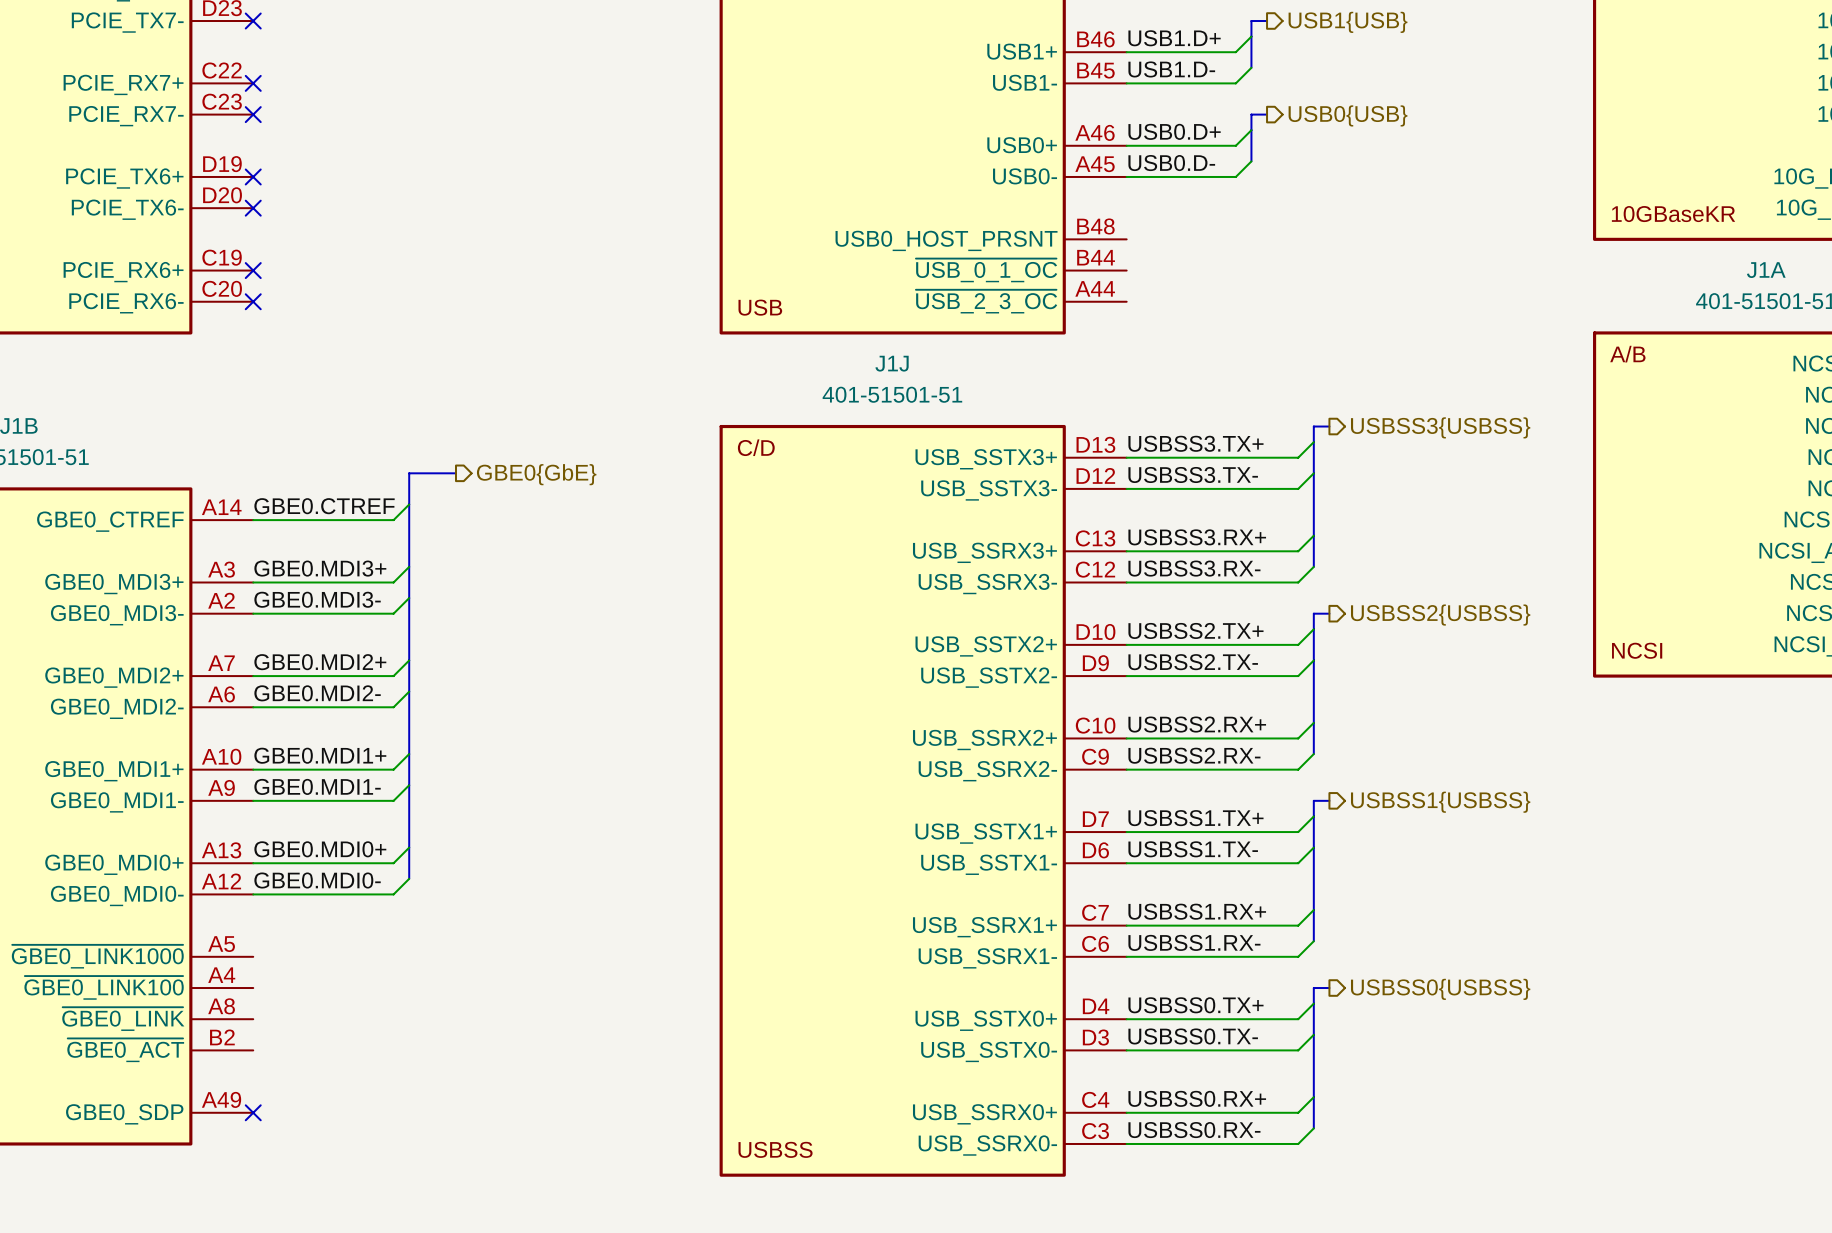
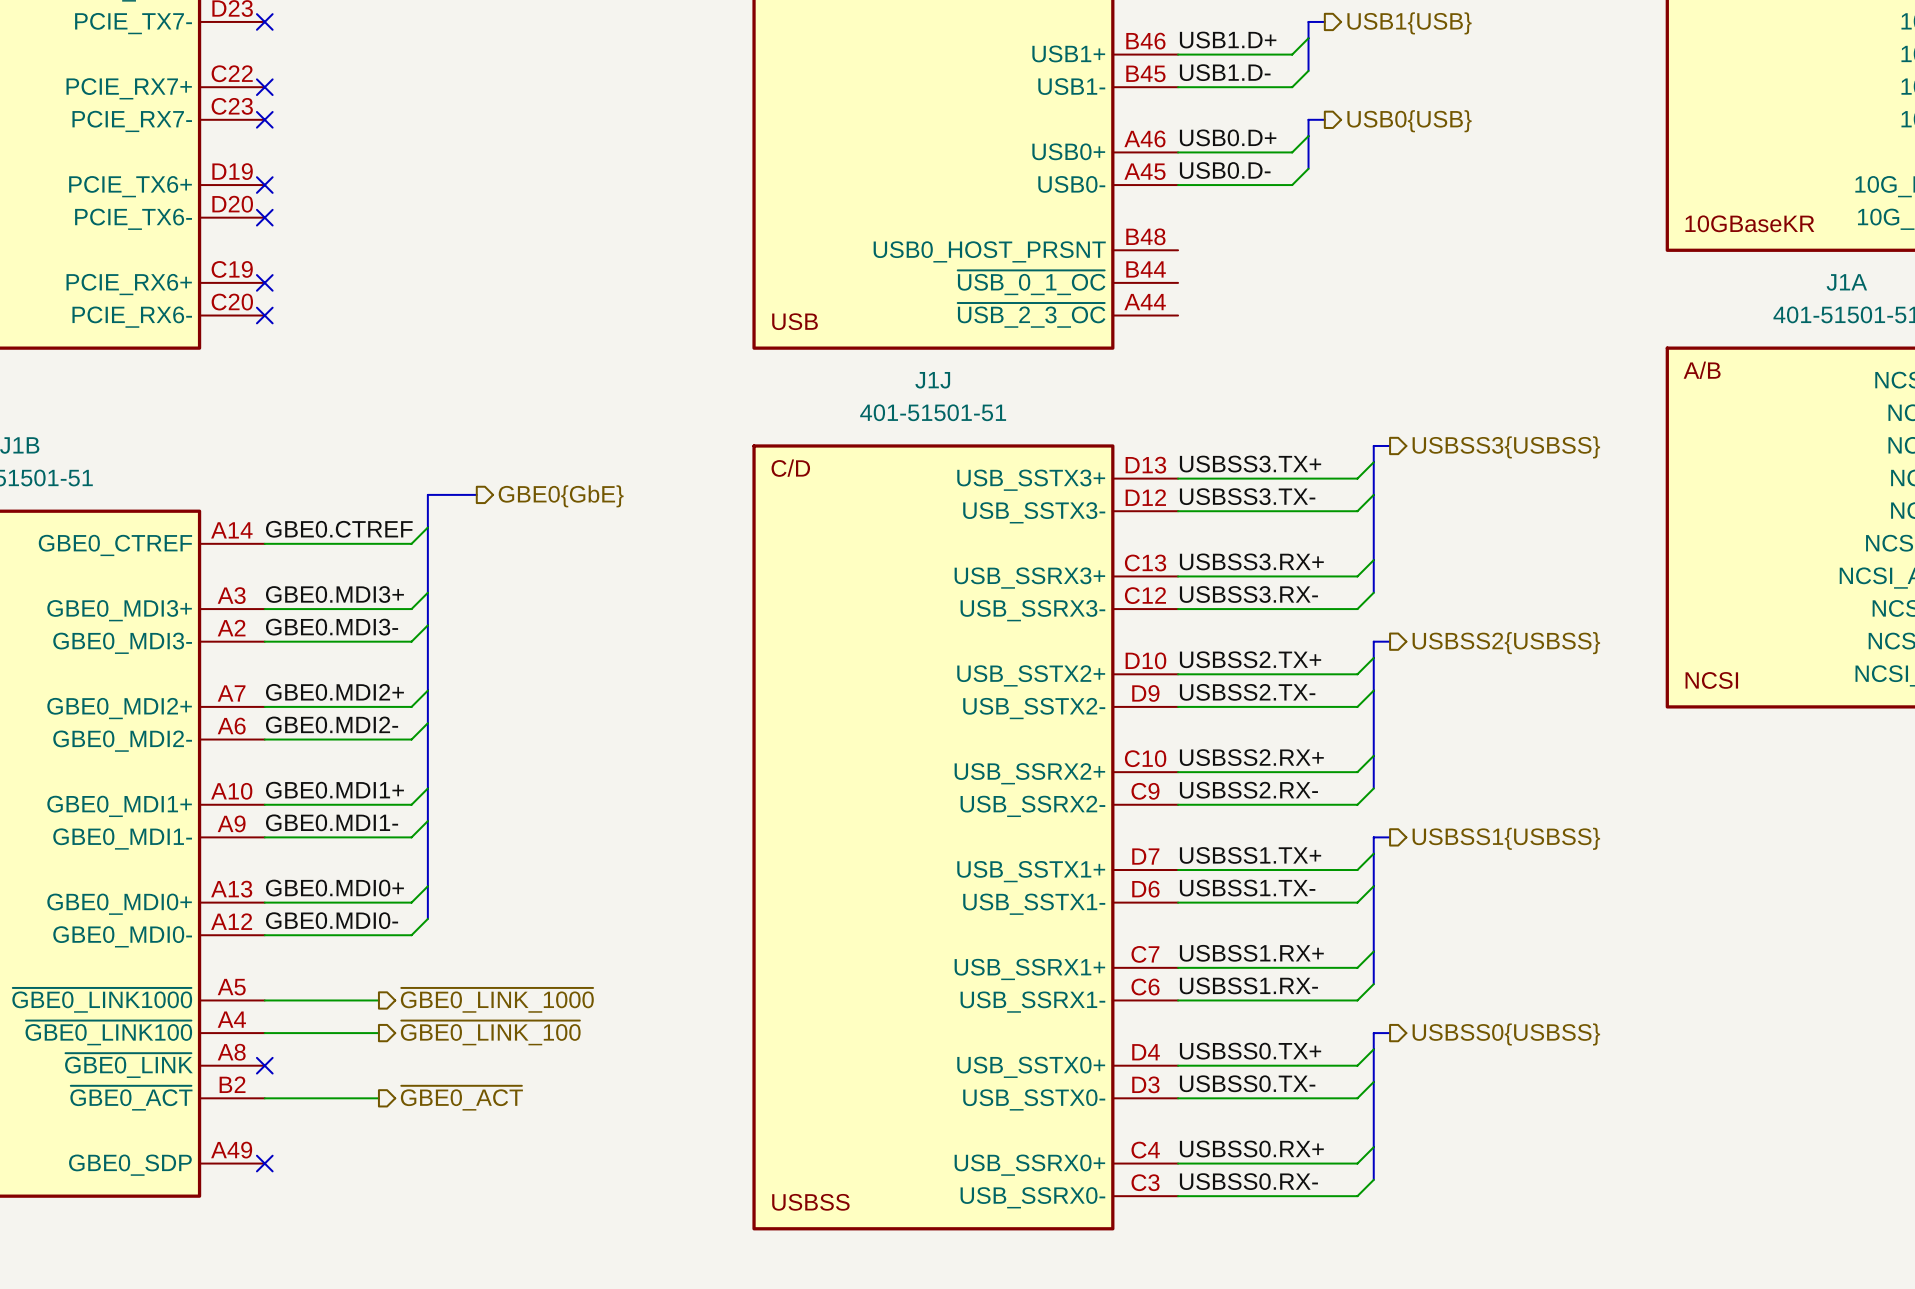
wire: none -> (264, 1000) (378, 1000)
hierarchical label: none -> ~{GBE0_LINK_1000} (497, 1000)
hierarchical label: none -> ~{GBE0_LINK_100} (490, 1032)
wire: none -> (264, 1033) (378, 1033)
no-connect mark: none -> (264, 1065)
wire: none -> (264, 1098) (378, 1098)
hierarchical label: none -> ~{GBE0_ACT} (461, 1098)

